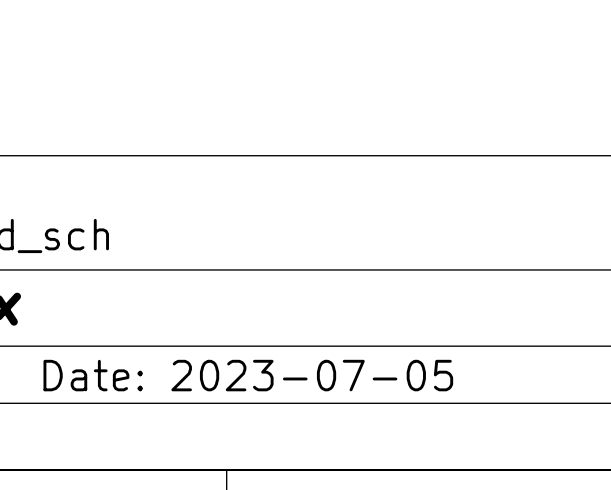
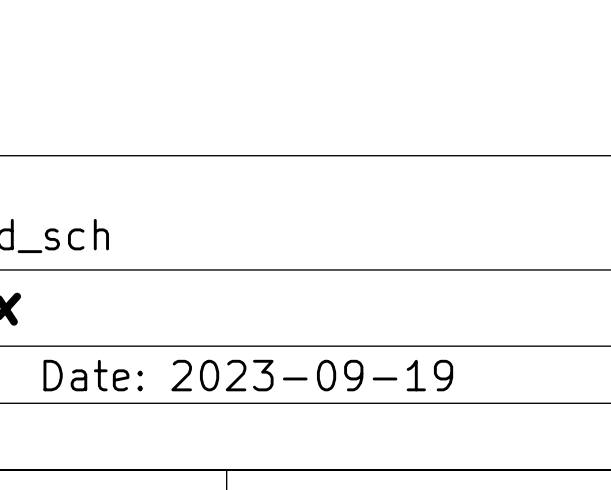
title block: Date: 2023-07-05 (248, 375) -> Date: 2023-09-19 (248, 375)

